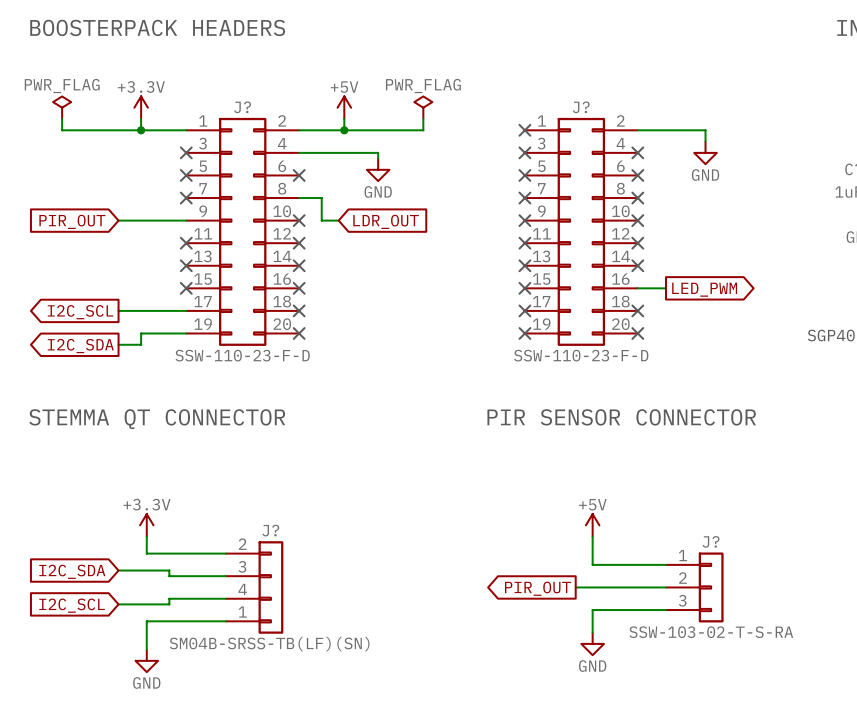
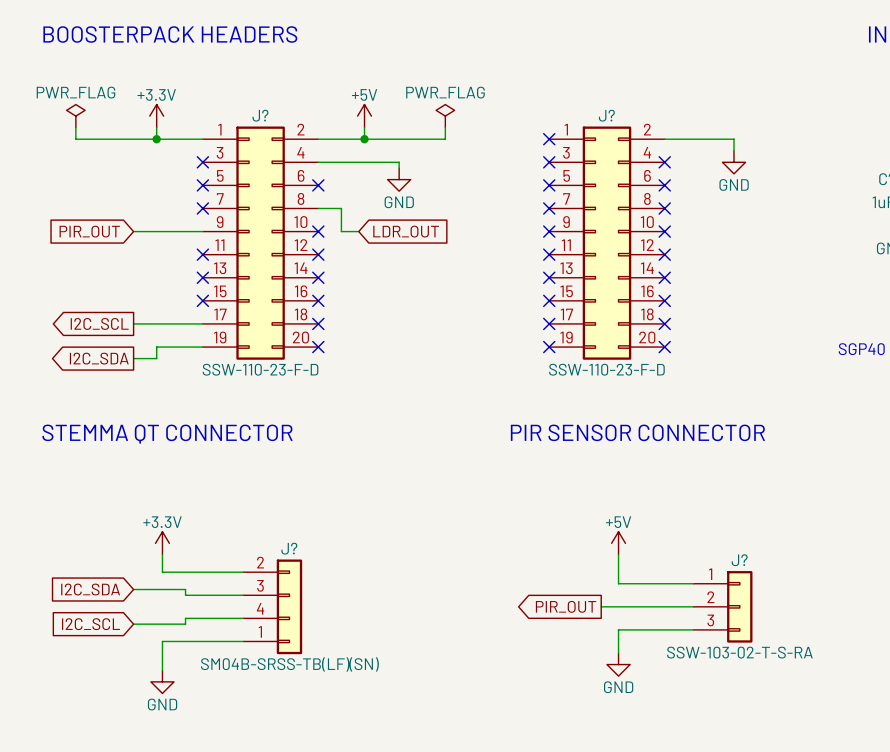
wire: (637, 288) (666, 288) -> none
no-connect mark: none -> (664, 300)
global label: LED_PWM (704, 289) -> none

